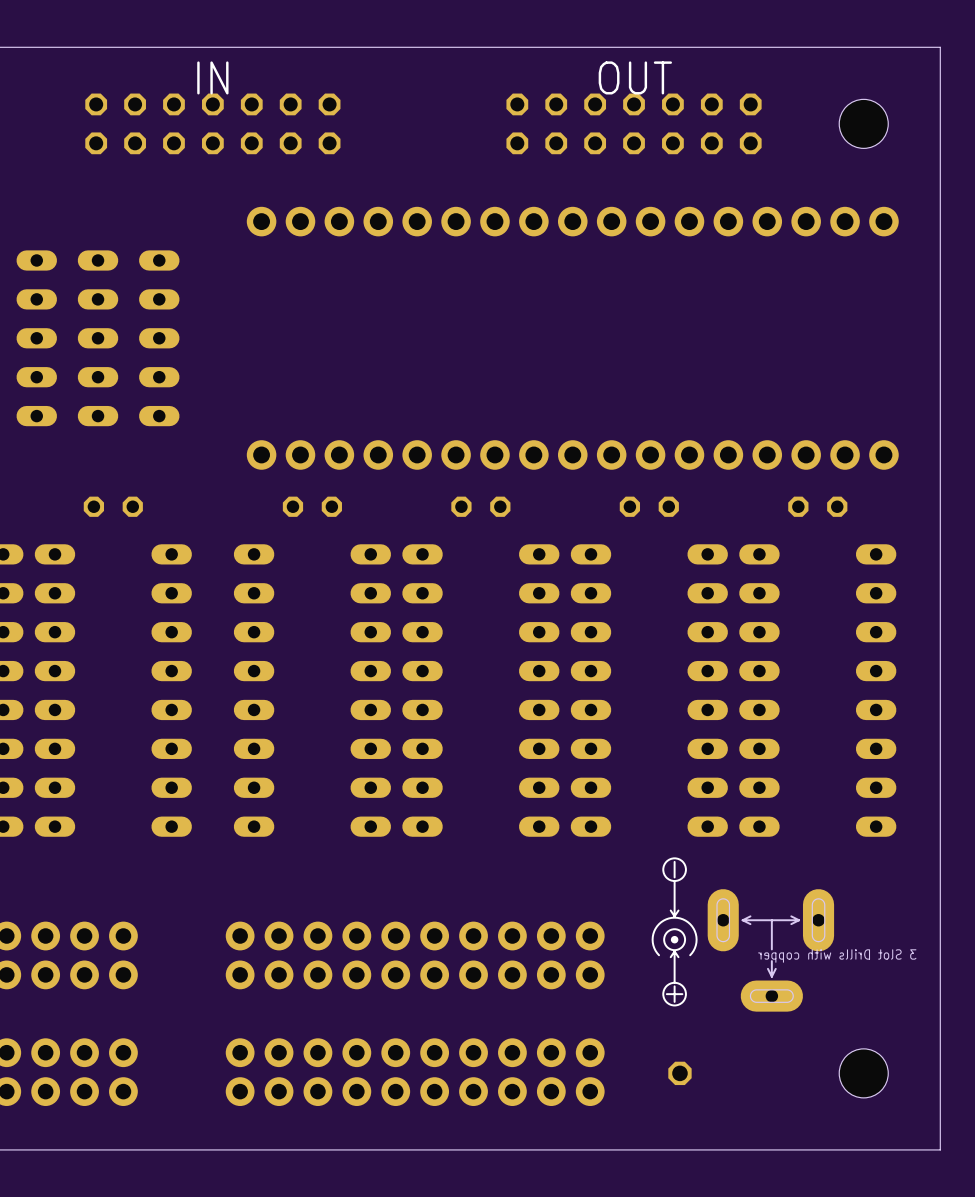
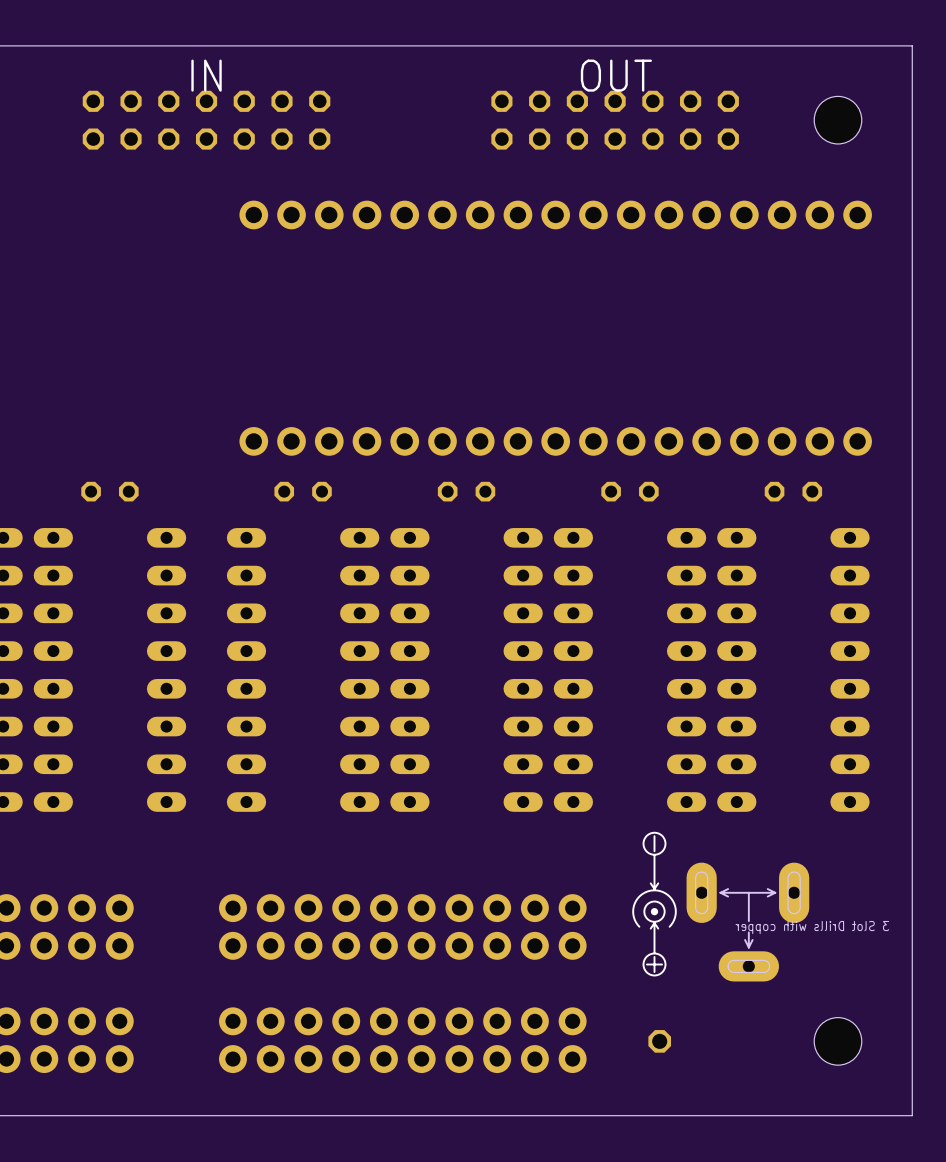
part: (36, 338) -> none
part: (98, 338) -> none
part: (159, 338) -> none

